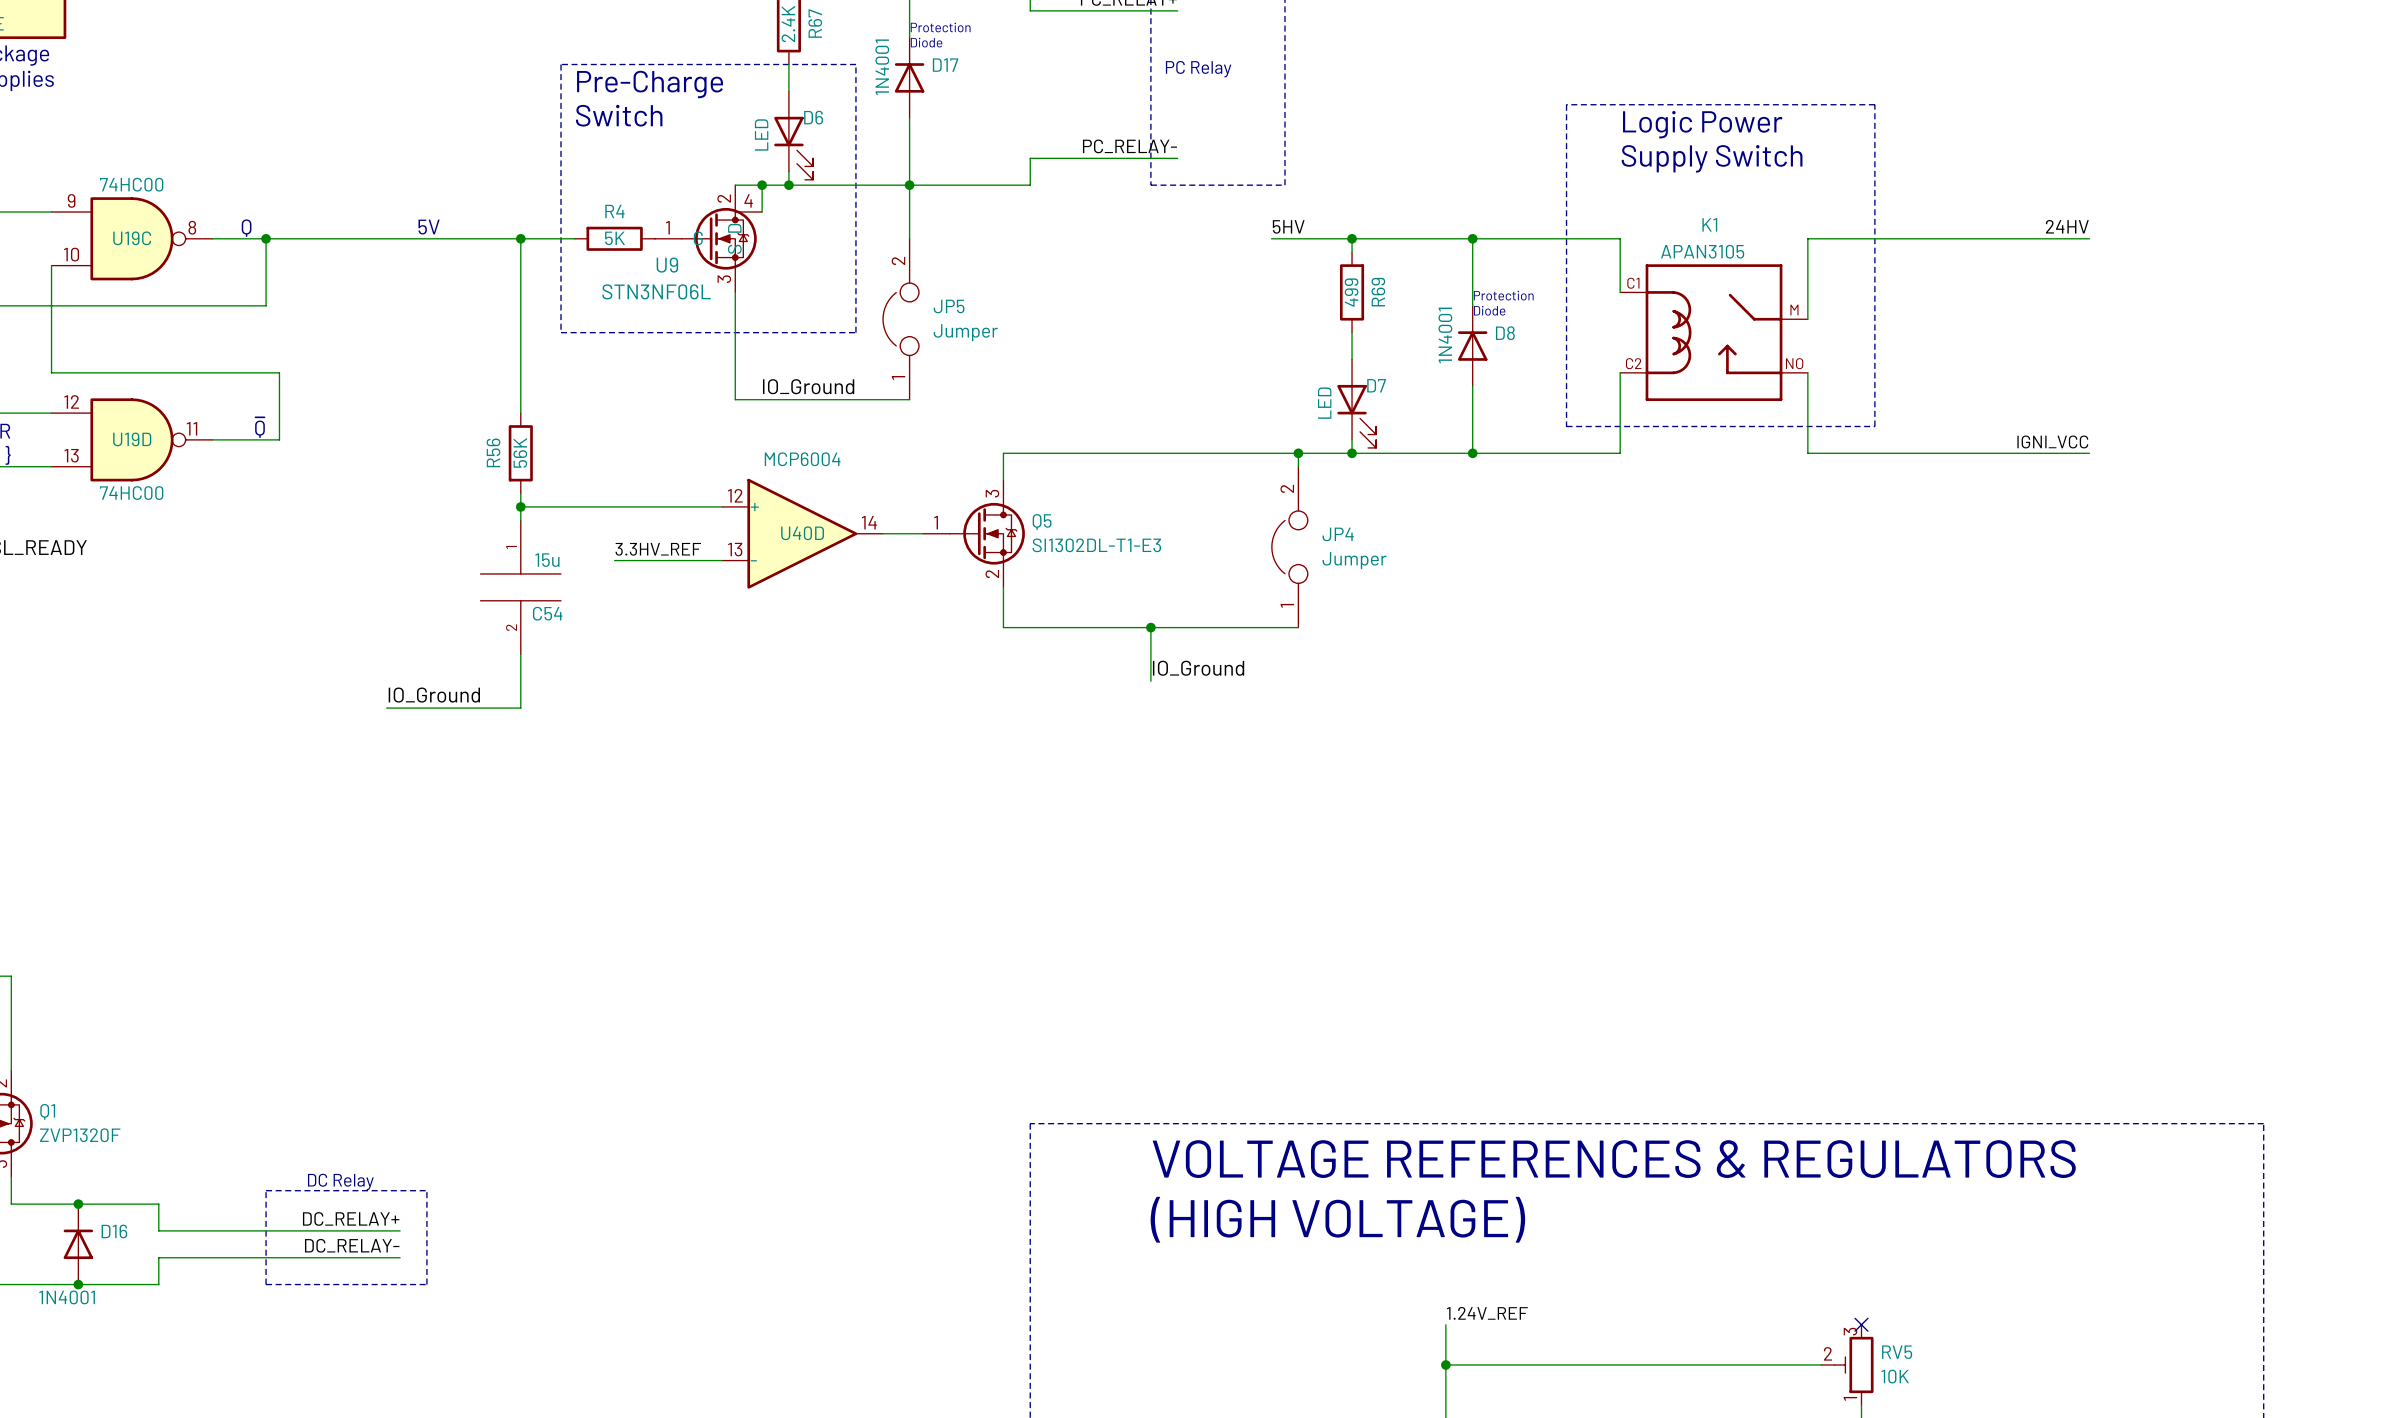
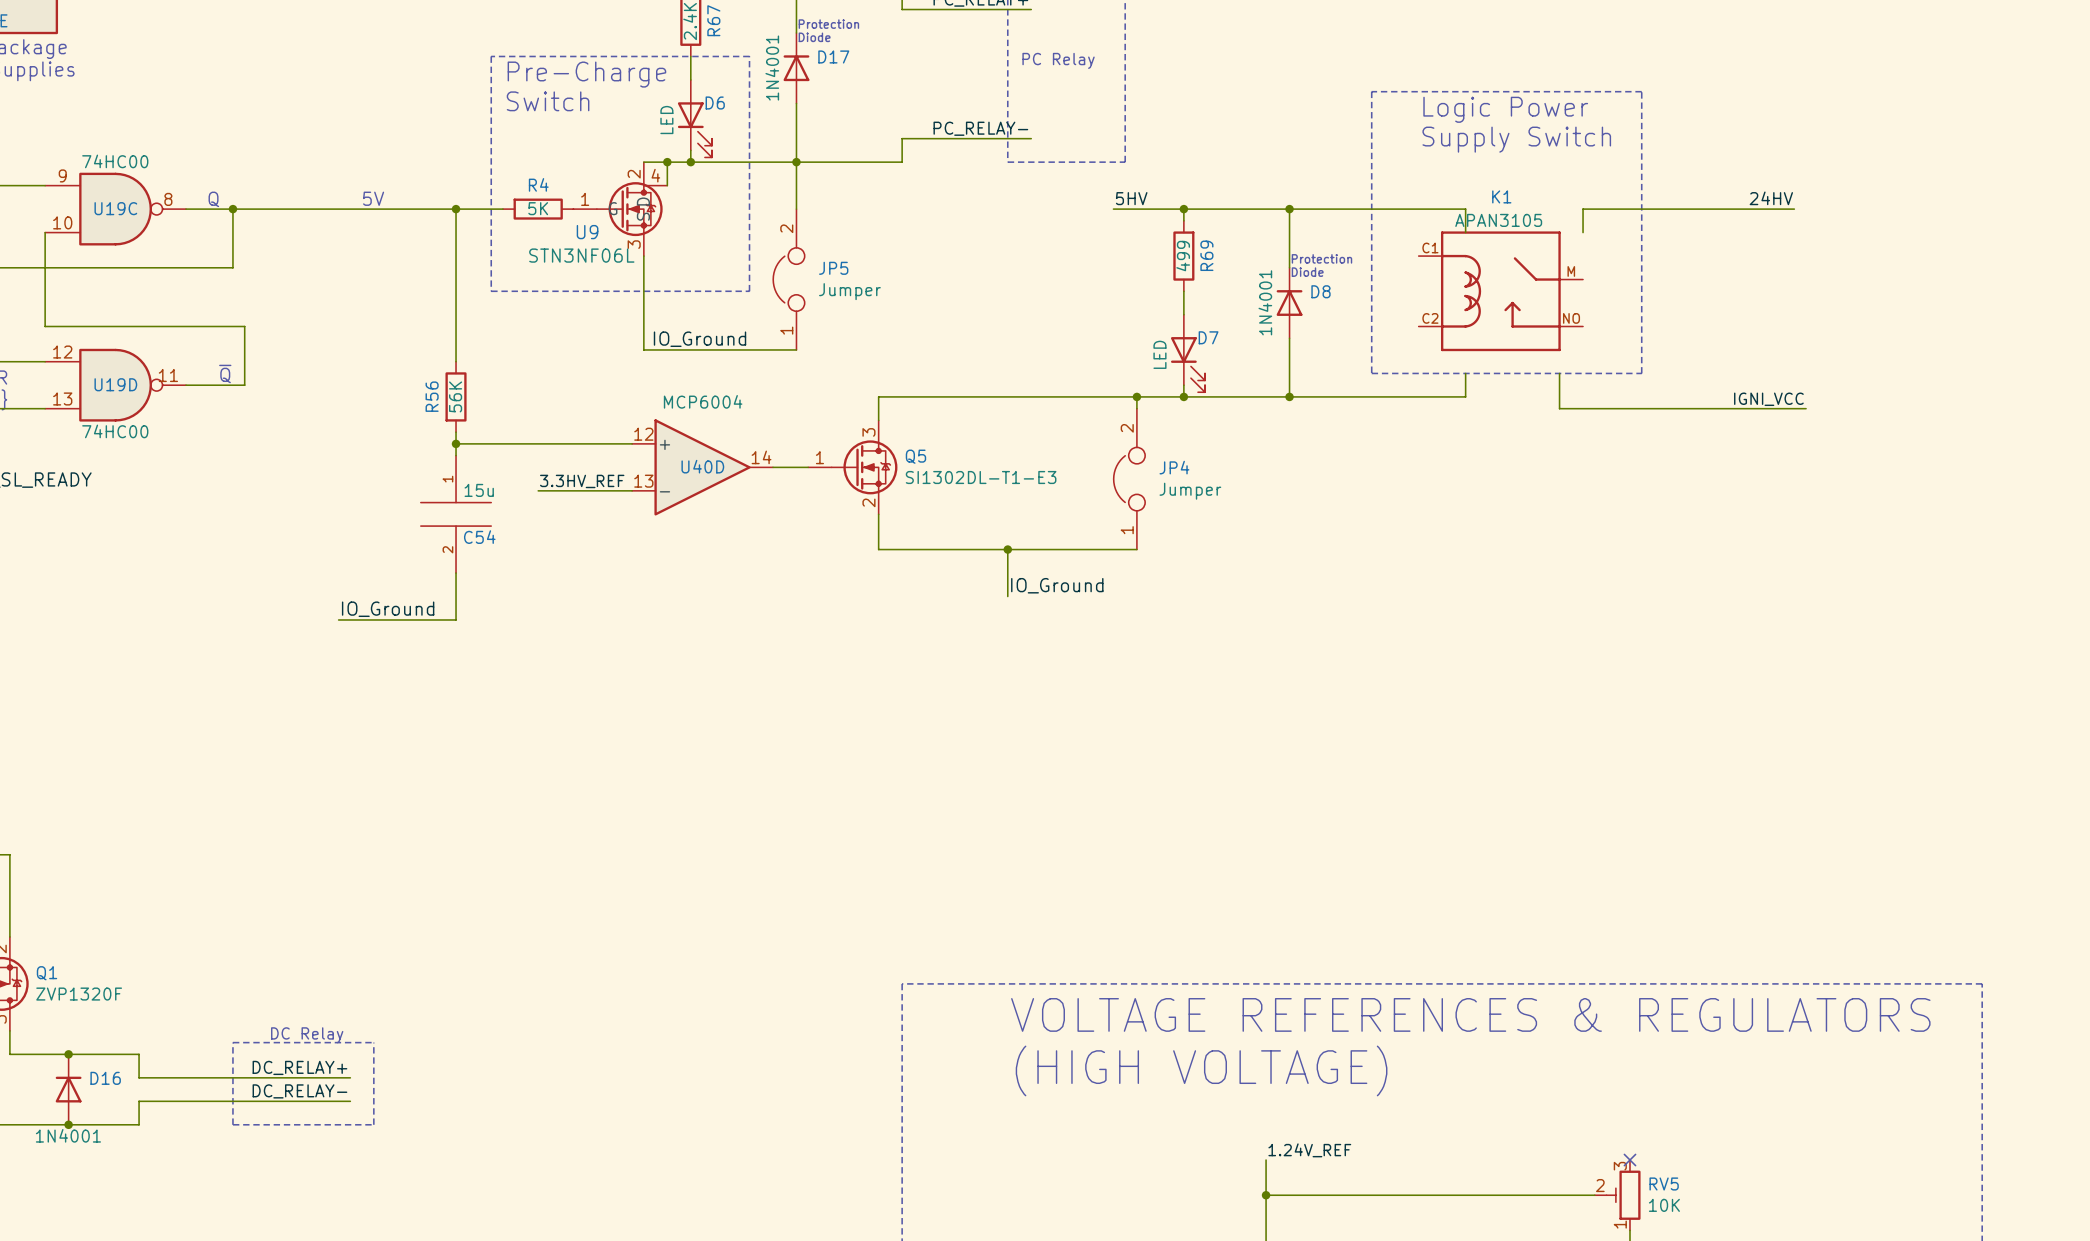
label position: 24HV (2067, 226) -> 24HV (1771, 198)
wire: (1620, 238) (1620, 292) -> (1418, 209) (1465, 209) (1465, 232)
wire: (2049, 238) (2089, 238) -> none
wire: (1807, 265) (1807, 319) -> none
wire: (1620, 372) (1620, 453) -> (1465, 373) (1465, 396) (1418, 396)
wire: (1807, 372) (1807, 453) (2089, 453) -> none
wire: none -> (1559, 373) (1559, 408) (1806, 408)
label position: IGNI_VCC (2052, 441) -> IGNI_VCC (1768, 399)

